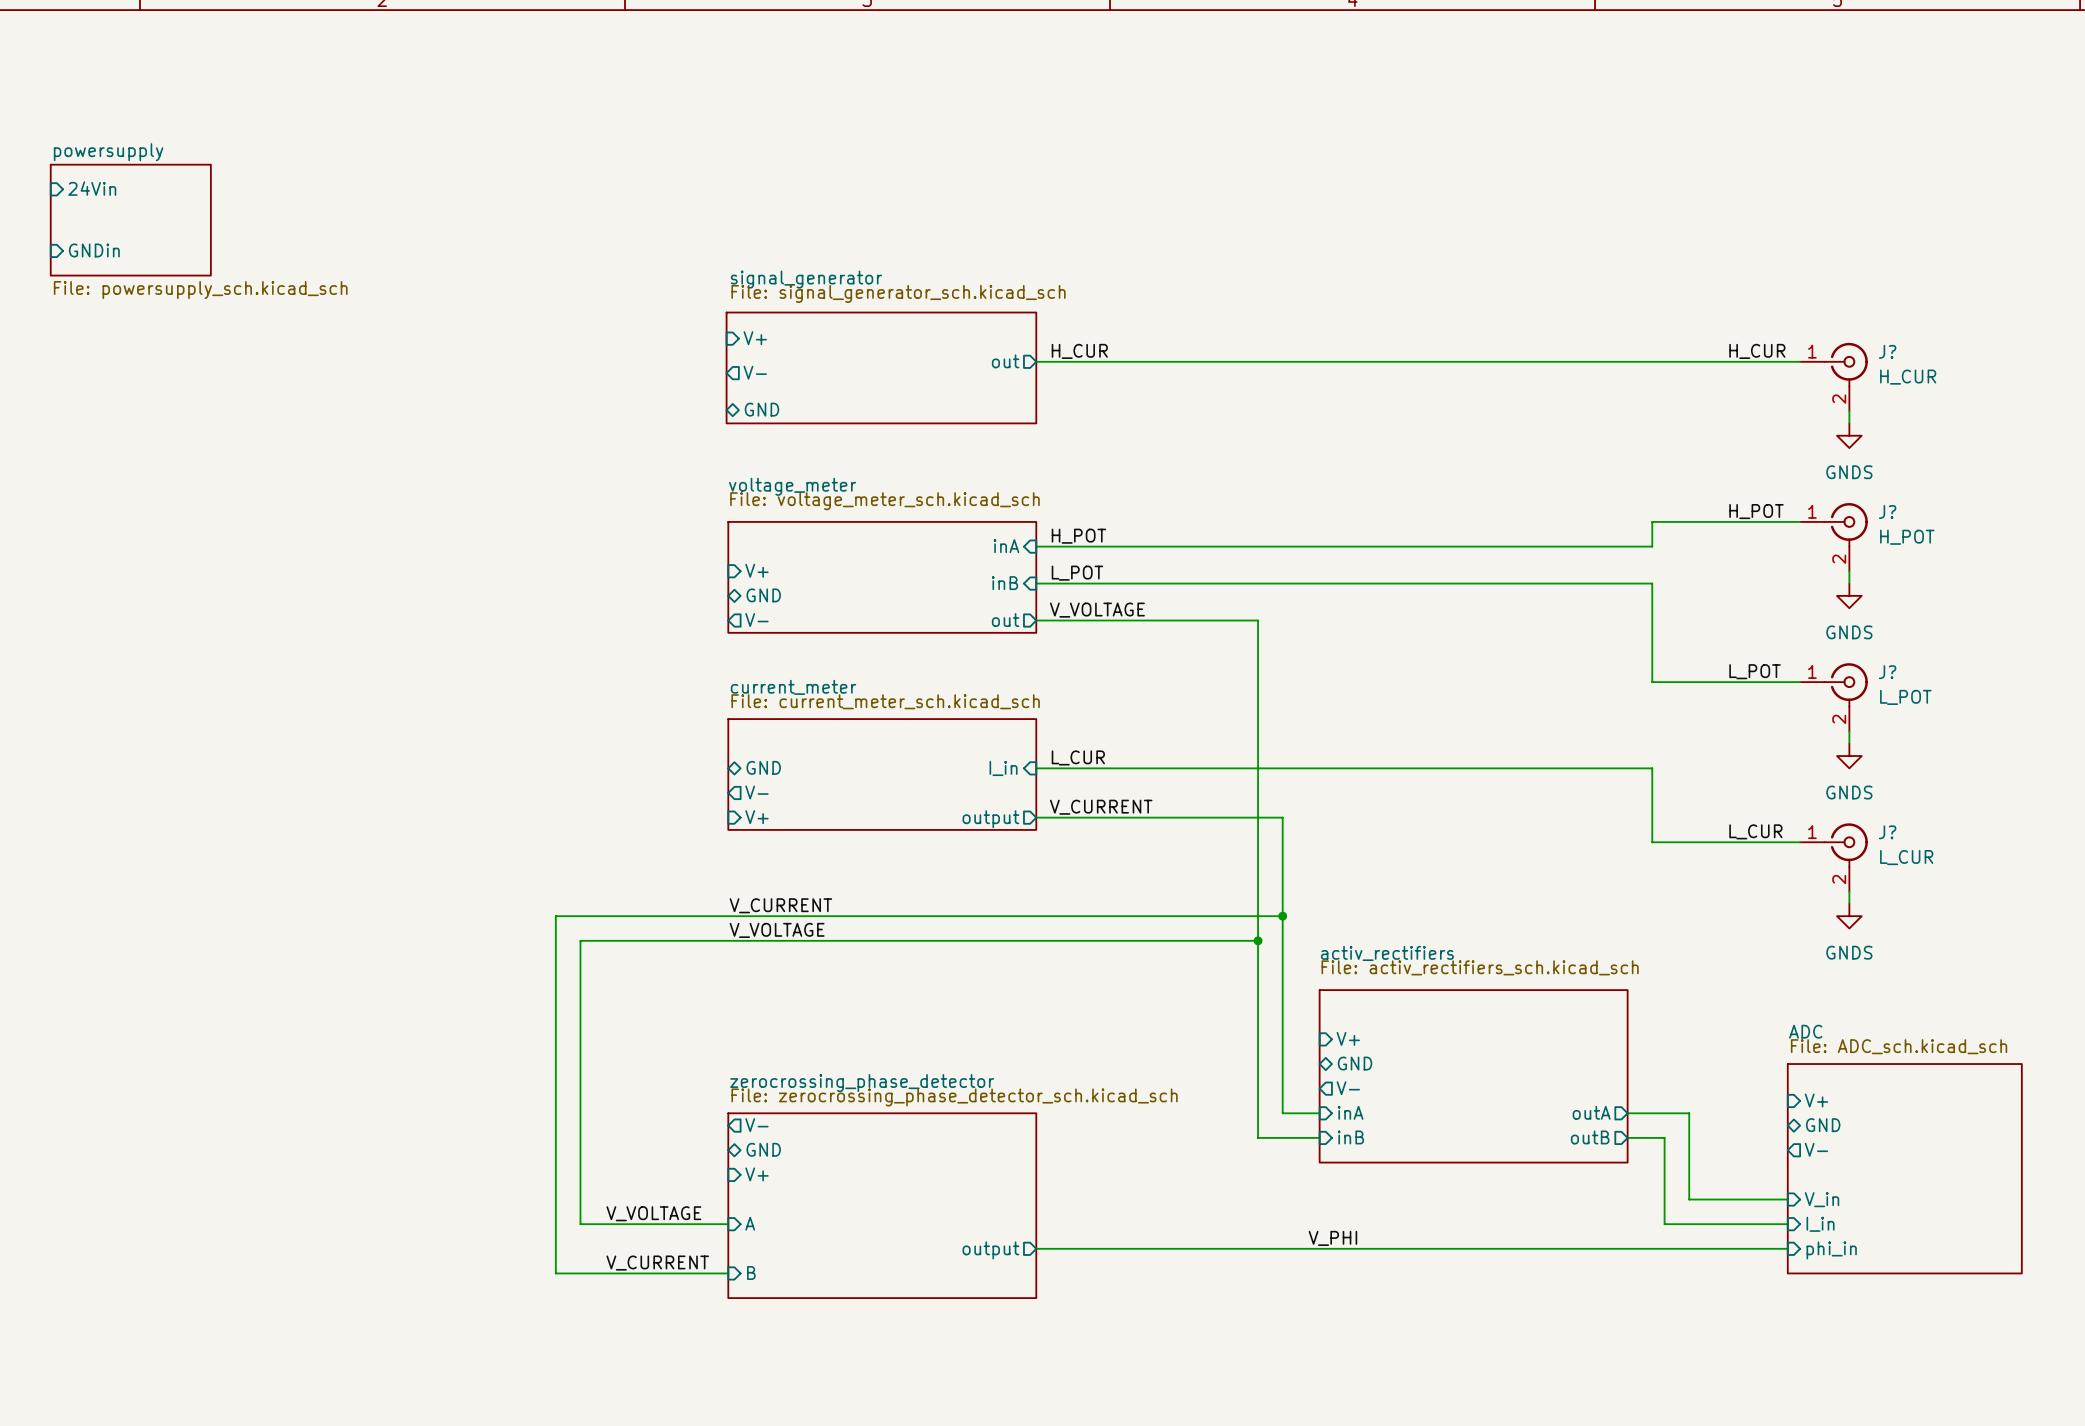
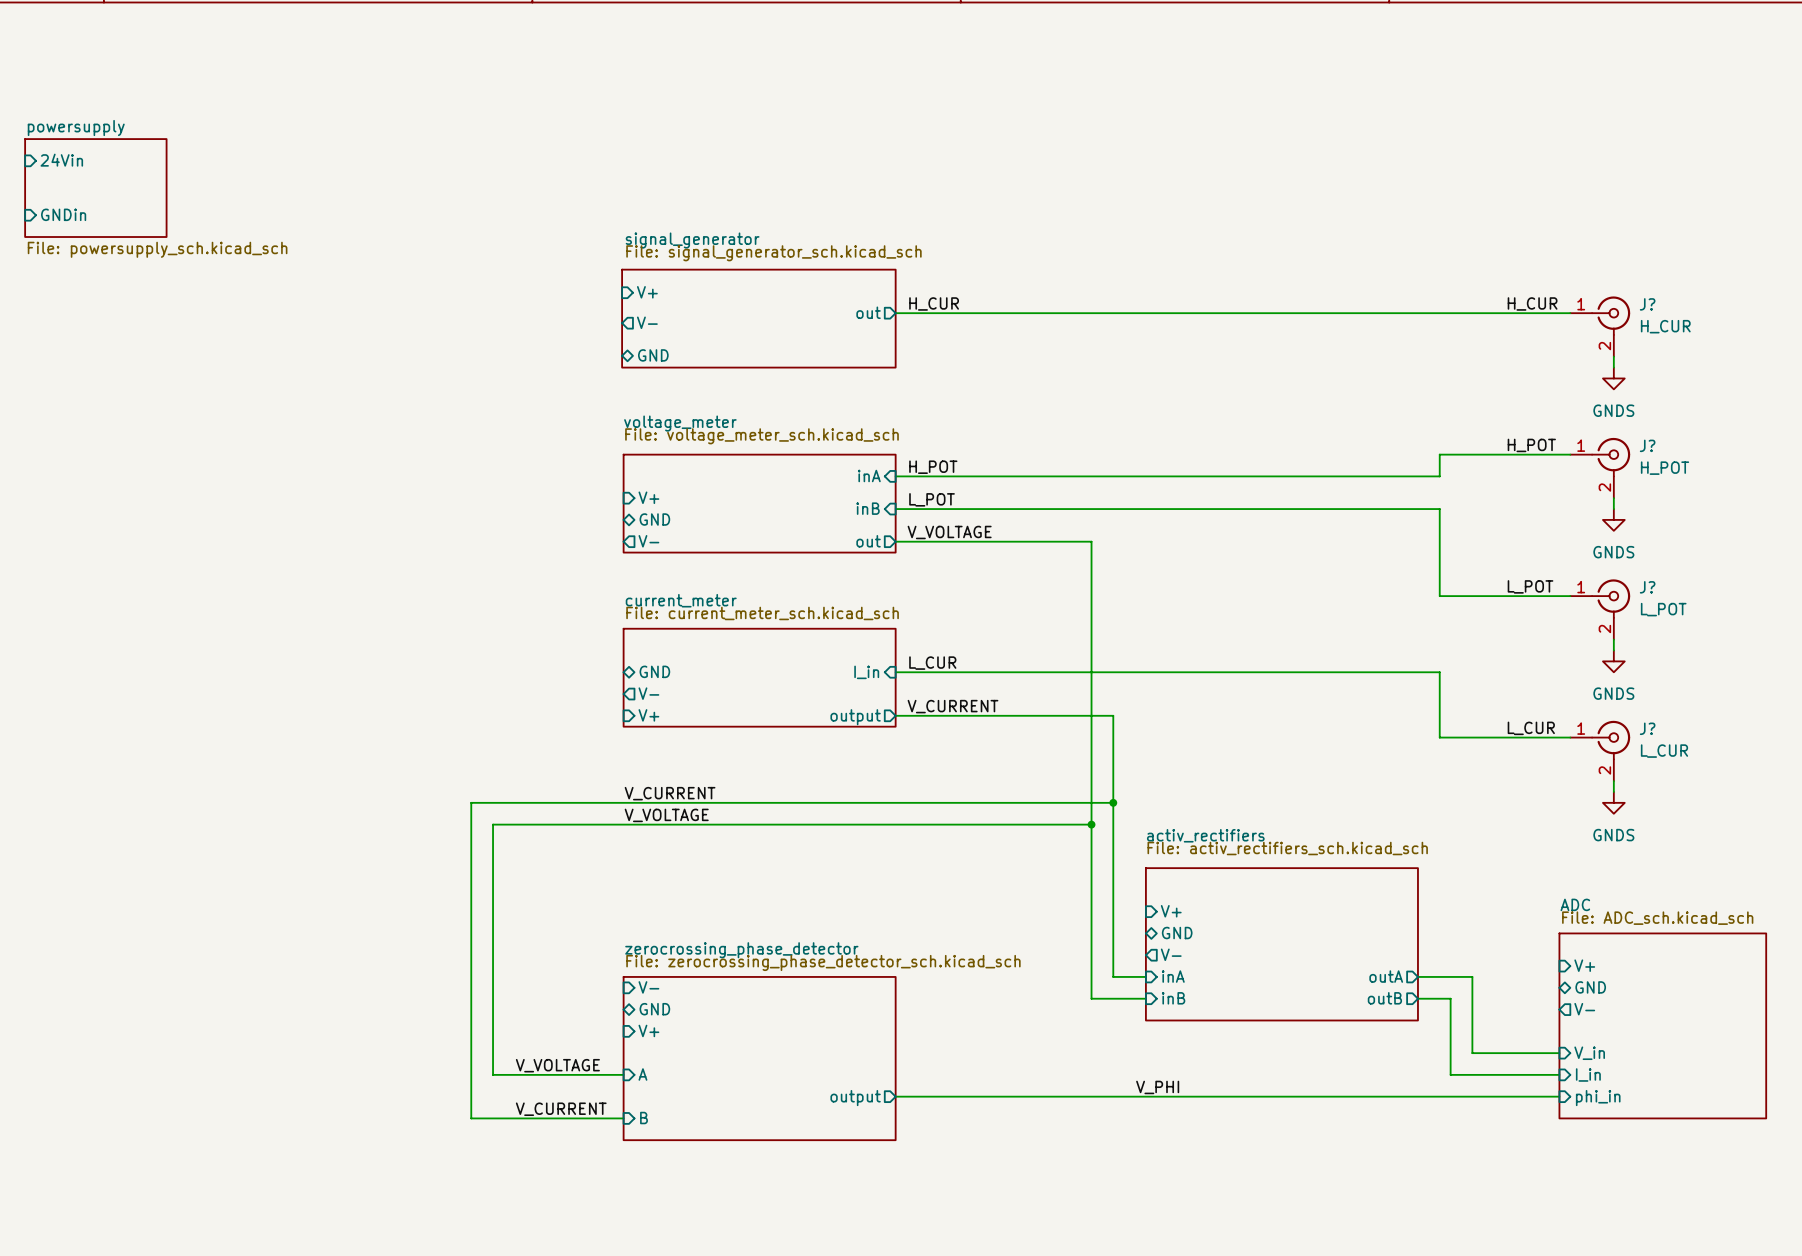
sheet pin shape: output (756, 1125) -> input (648, 987)

